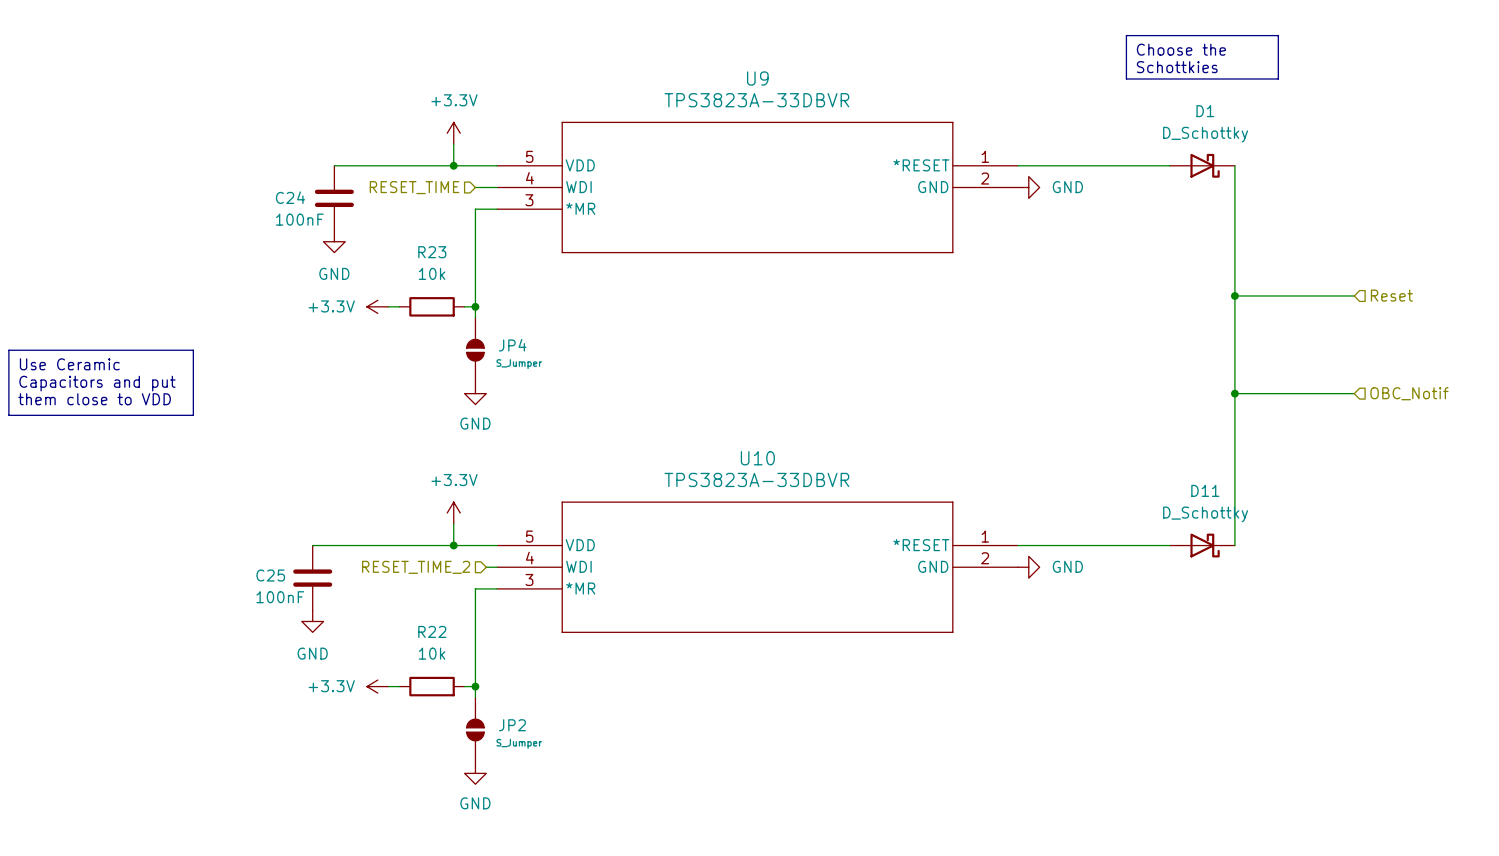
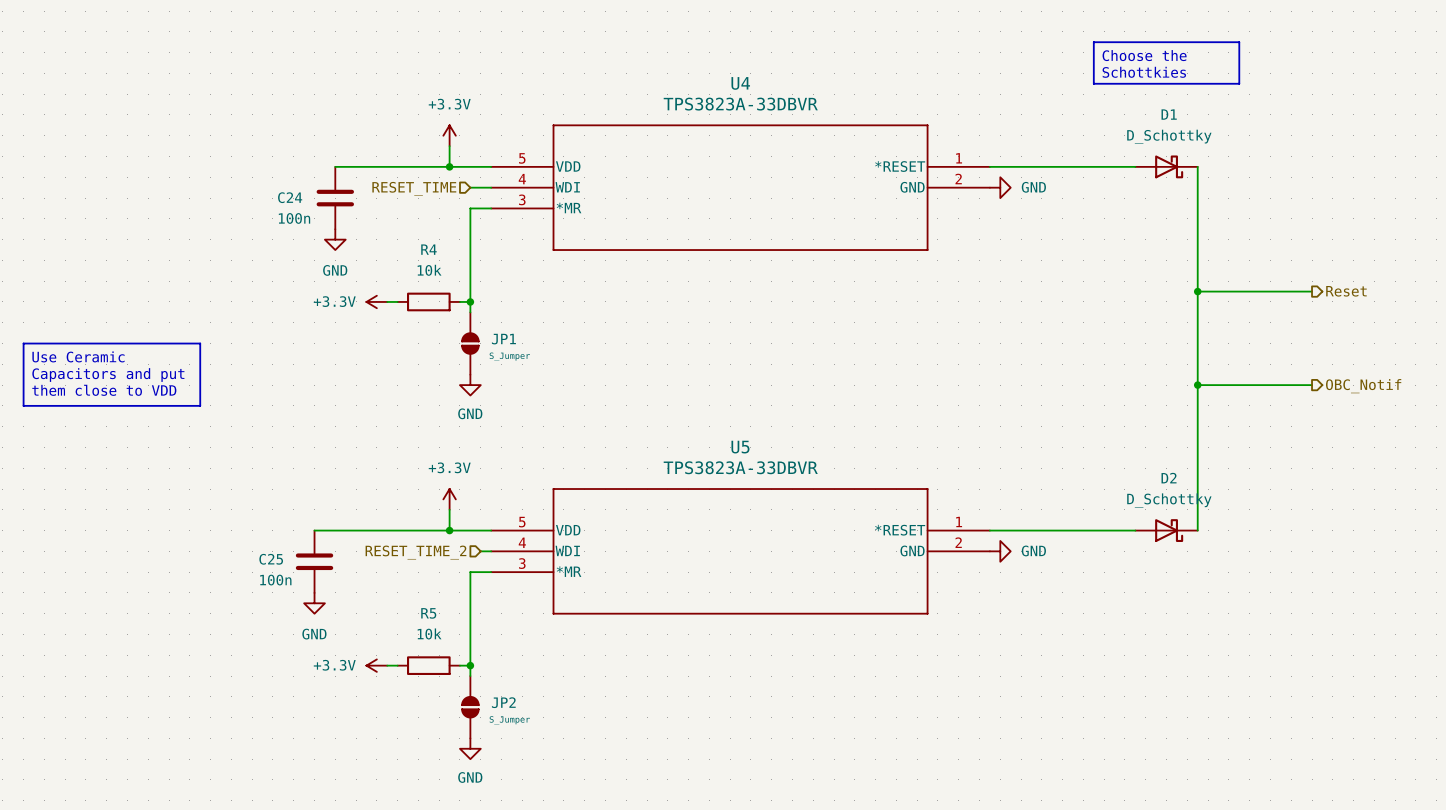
U9 name: U9 (757, 78) -> U4 (740, 83)
C24 value: 100nF (299, 219) -> 100n (294, 218)
R23 name: R23 (432, 252) -> R4 (428, 249)
hierarchical label shape: input (1391, 295) -> output (1346, 291)
JP4 name: JP4 (512, 345) -> JP1 (503, 339)
hierarchical label shape: input (1409, 393) -> output (1363, 386)
U10 name: U10 (757, 458) -> U5 (740, 447)
D11 name: D11 (1205, 490) -> D2 (1169, 478)
C25 value: 100nF (280, 597) -> 100n (275, 580)
R22 name: R22 (432, 631) -> R5 (428, 613)

